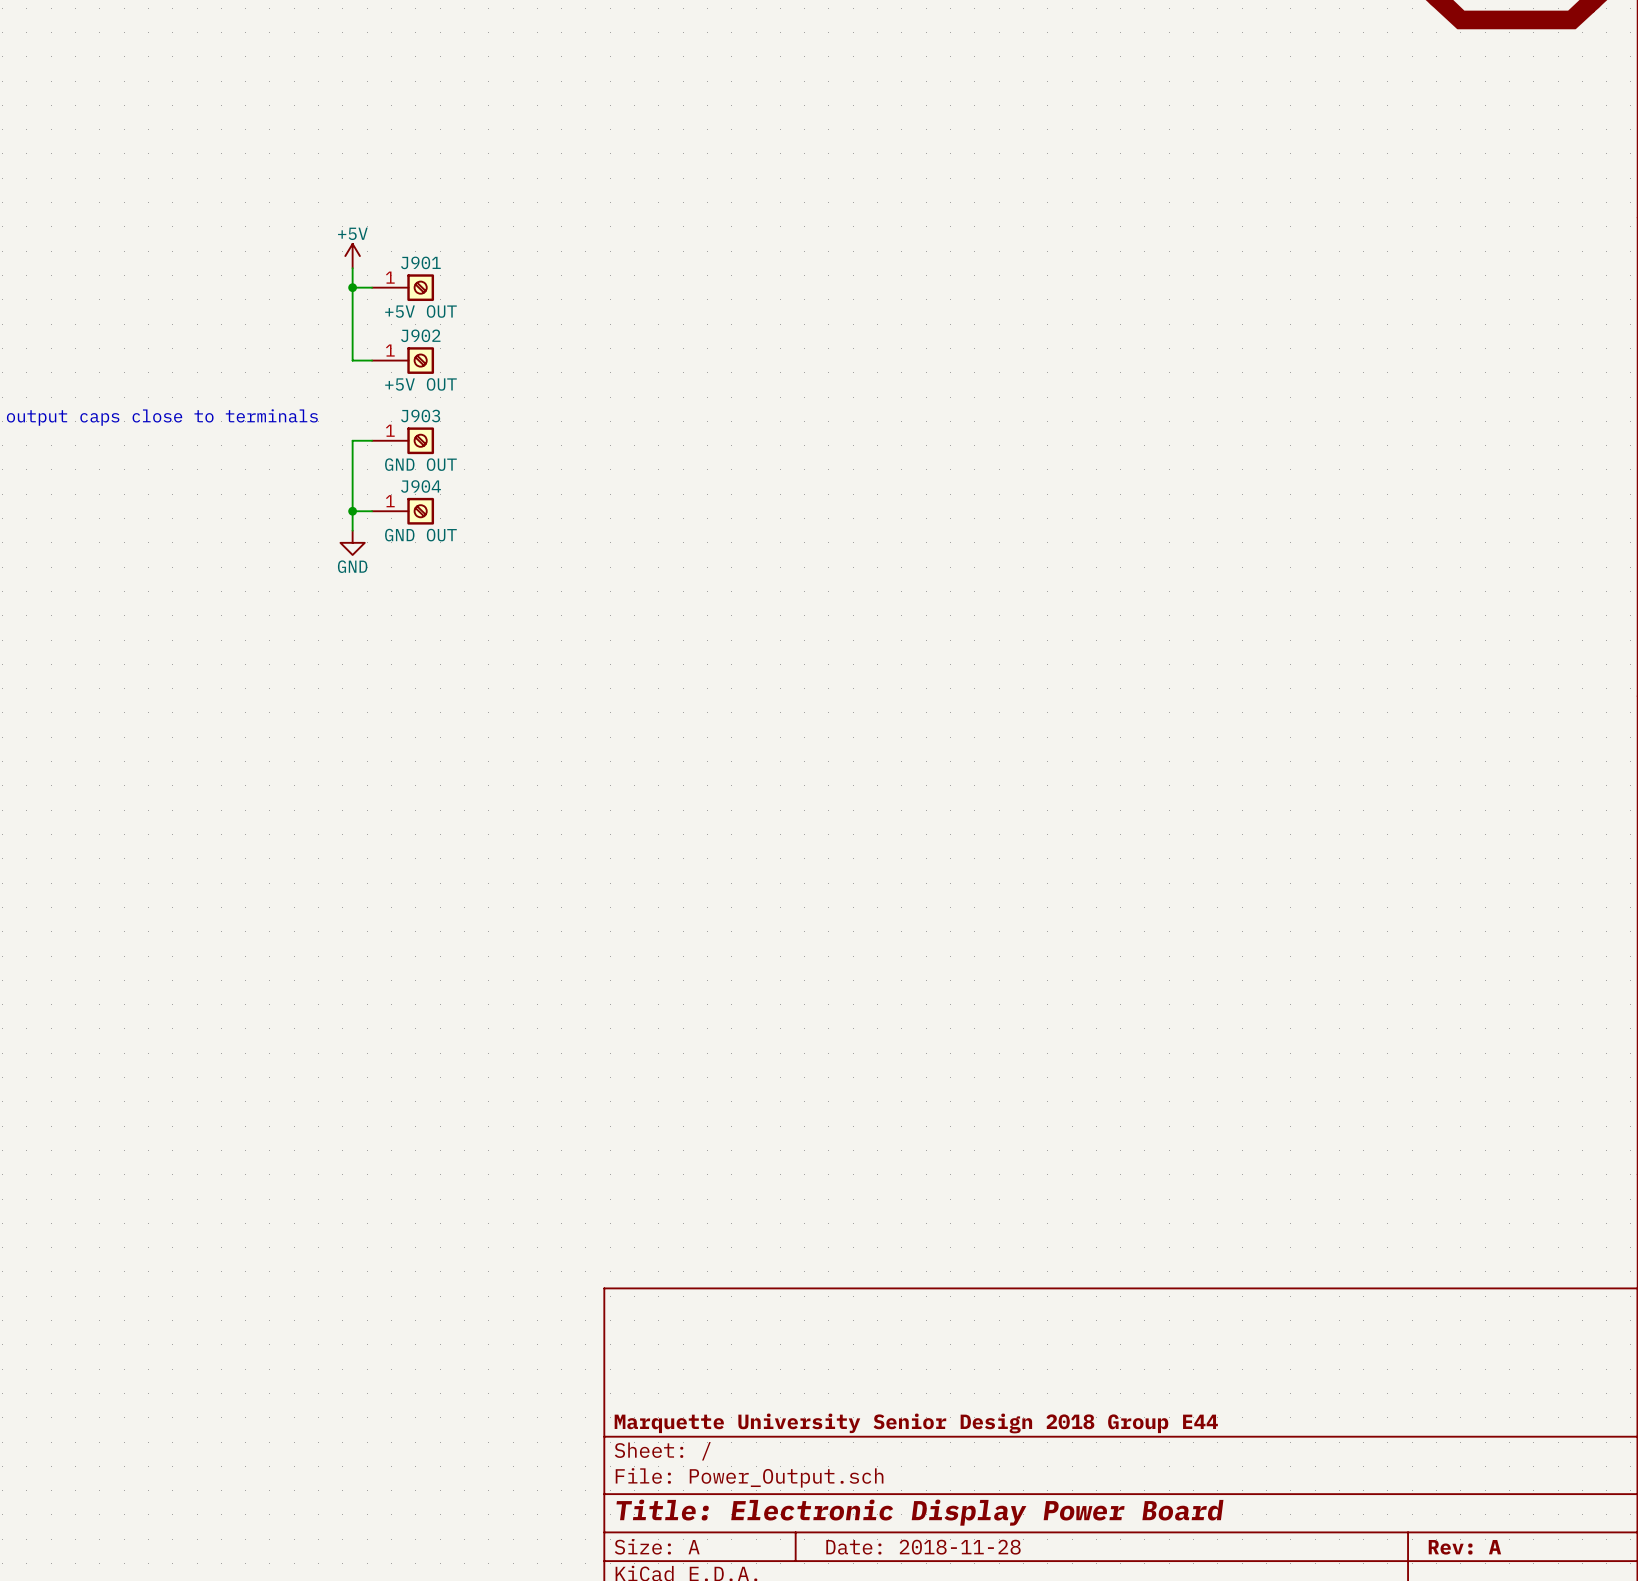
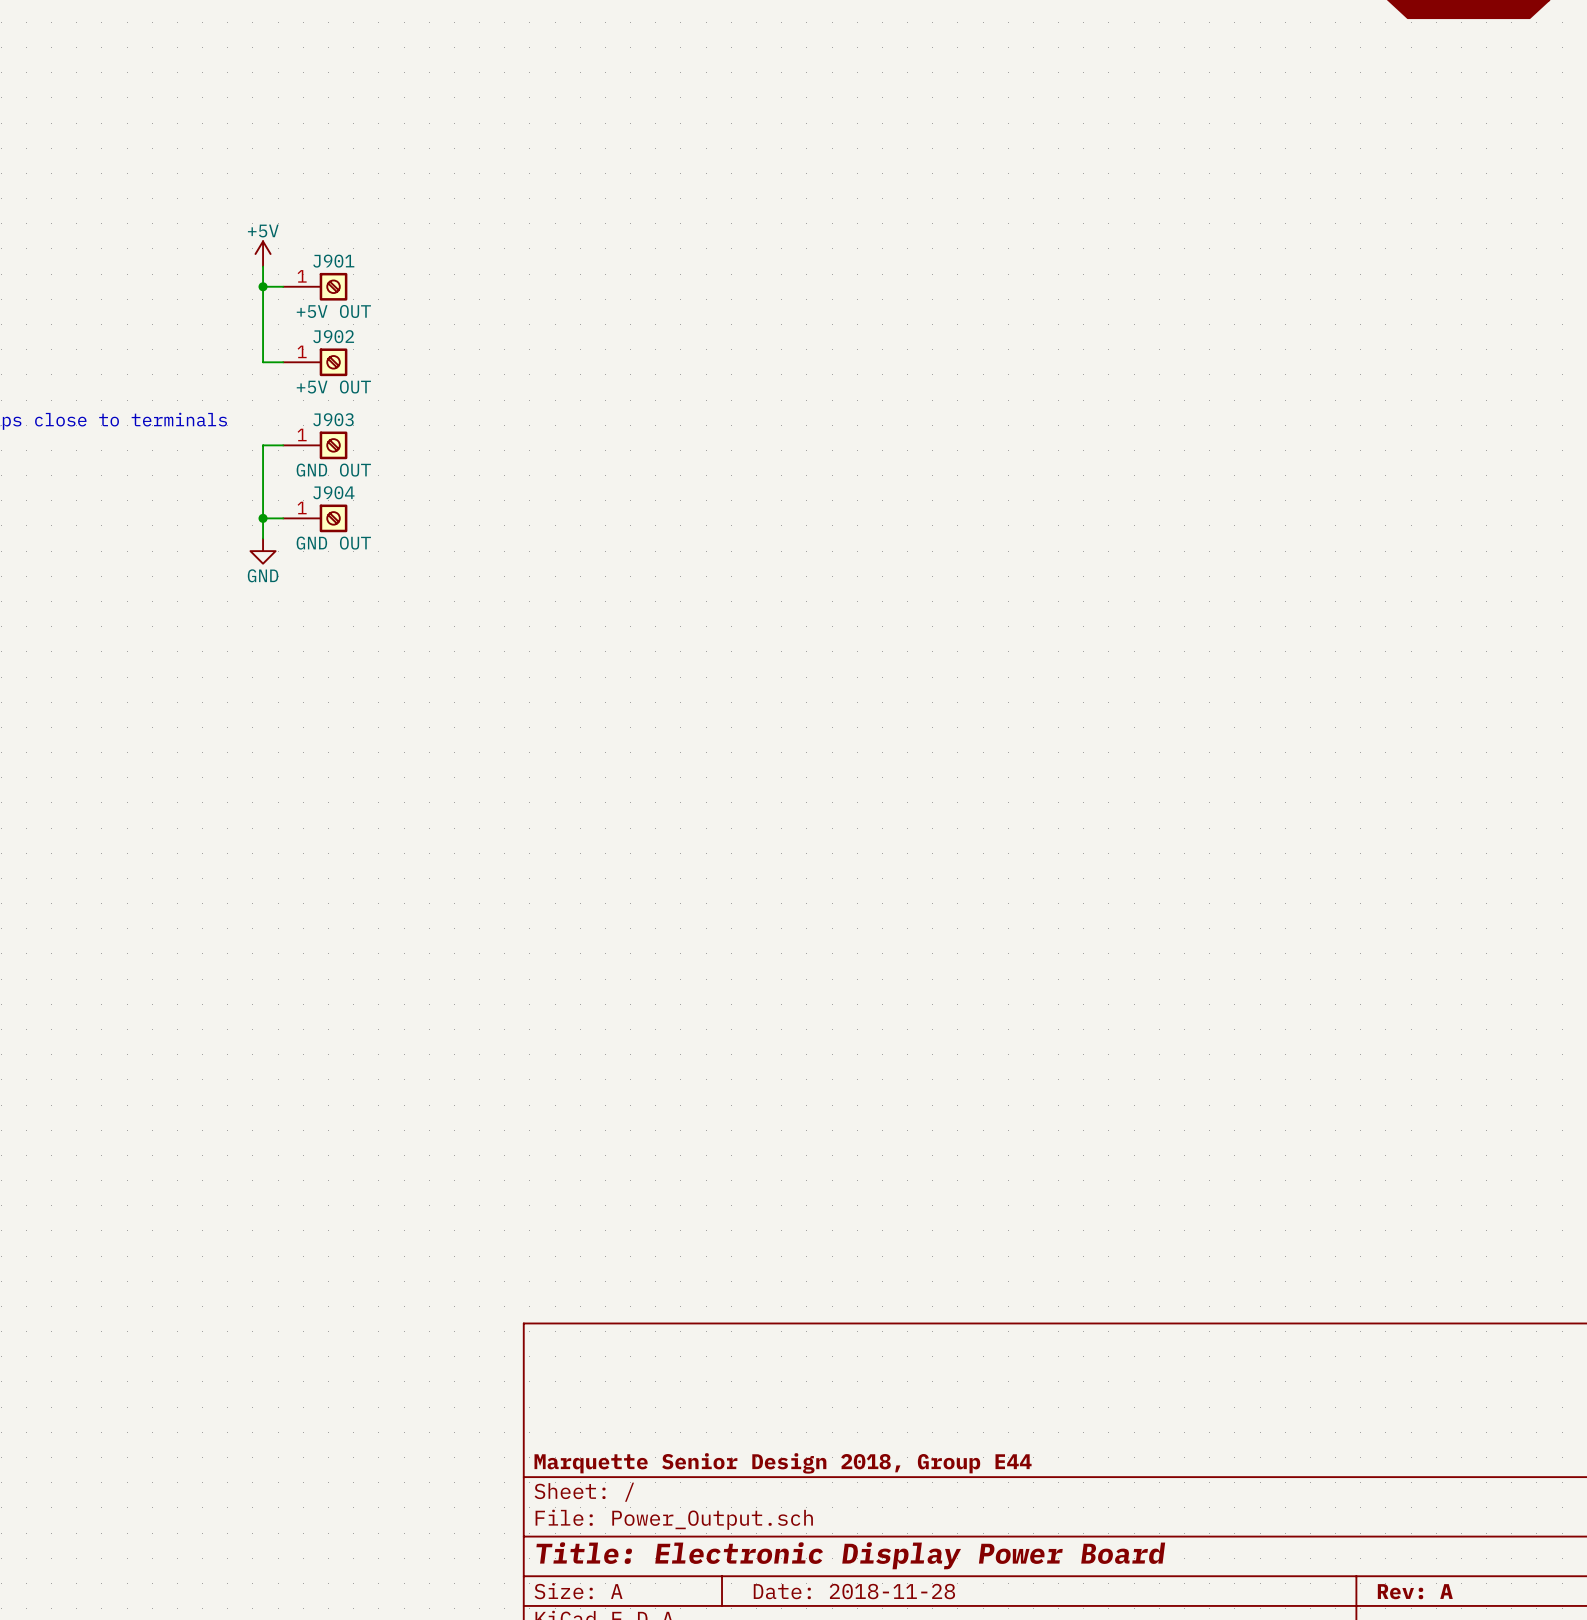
title block: Marquette University Senior Design 2018 Group E44 (916, 1423) -> Marquette Senior Design 2018, Group E44 (783, 1463)

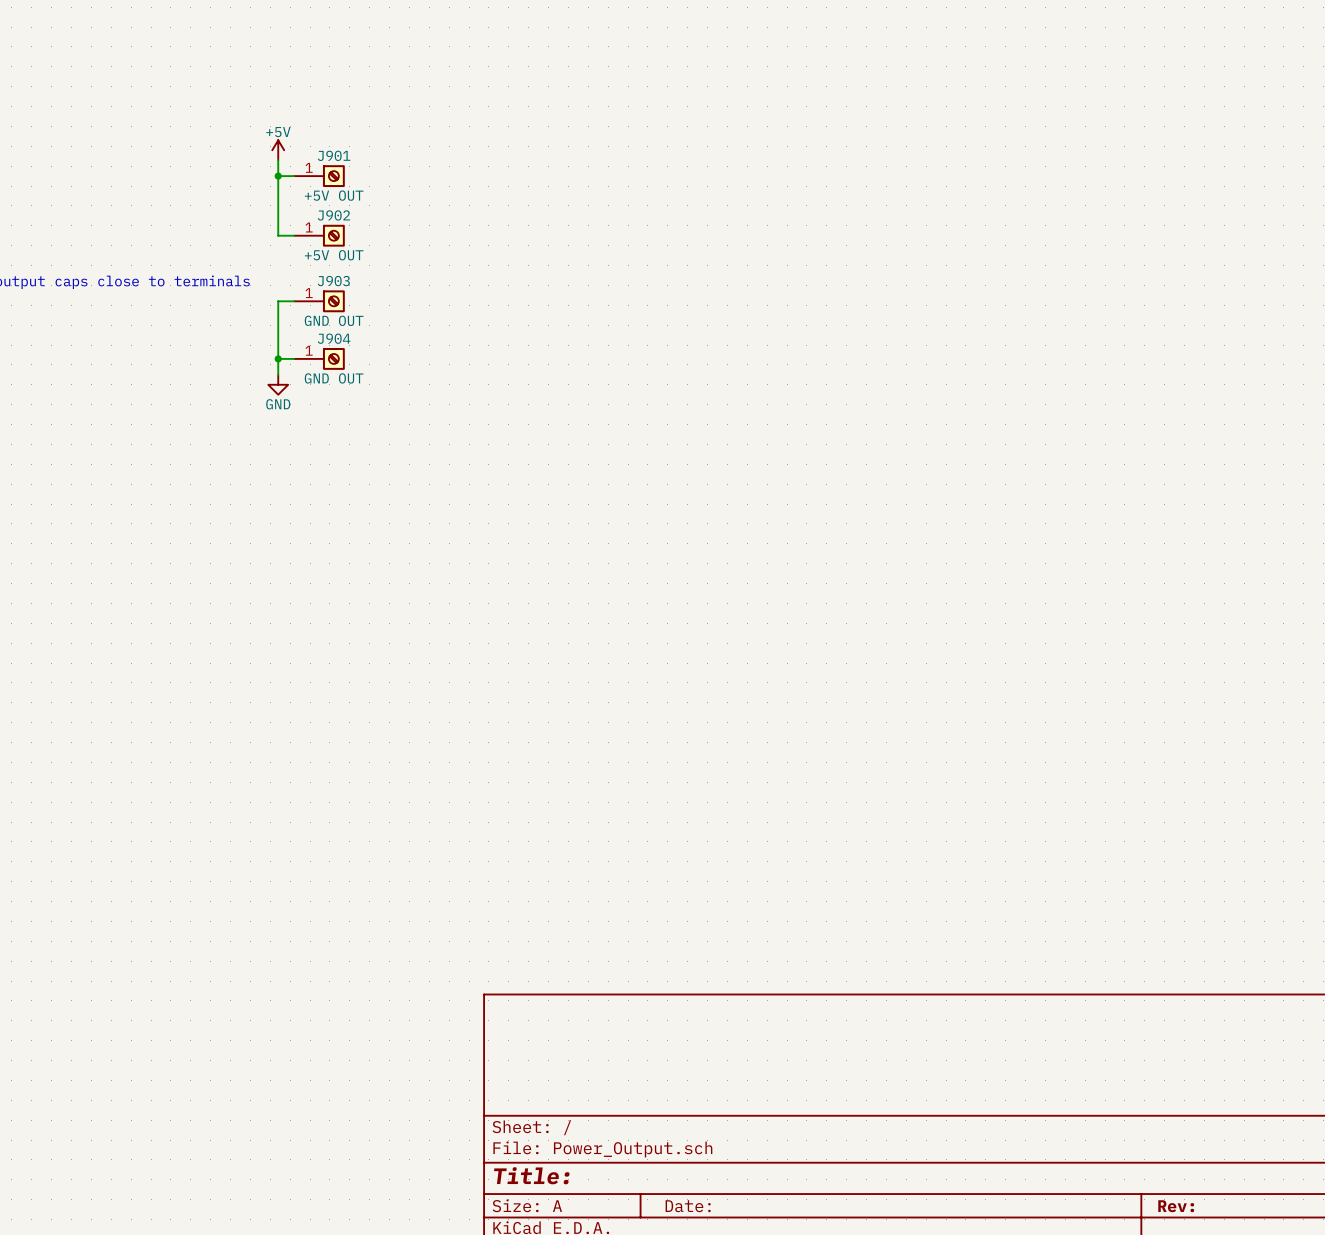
title block: Marquette Senior Design 2018, Group E44 (783, 1463) -> none
title block: Title: Electronic Display Power Board (850, 1555) -> Title: (531, 1175)
title block: Date: 2018-11-28 (854, 1591) -> Date: (688, 1206)
title block: Rev: A (1415, 1591) -> Rev: (1176, 1206)

